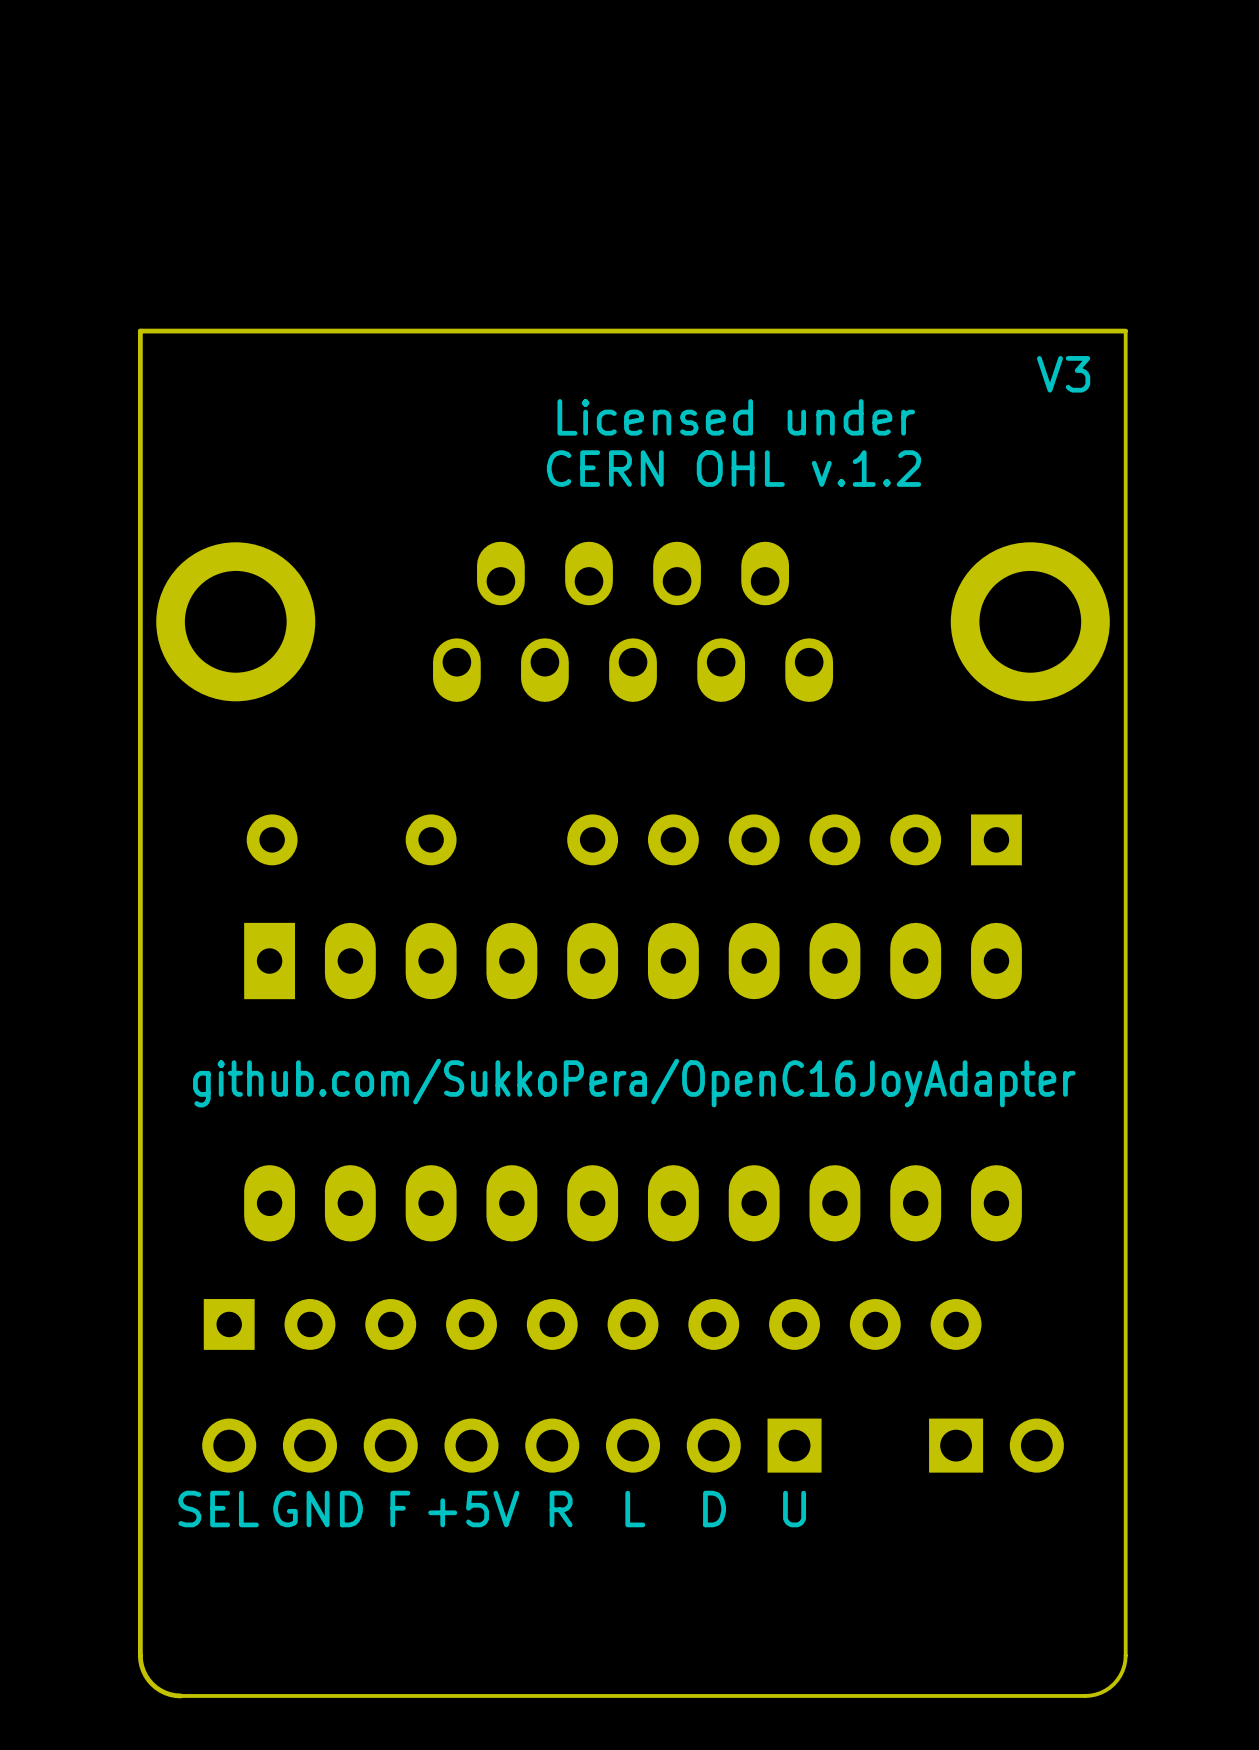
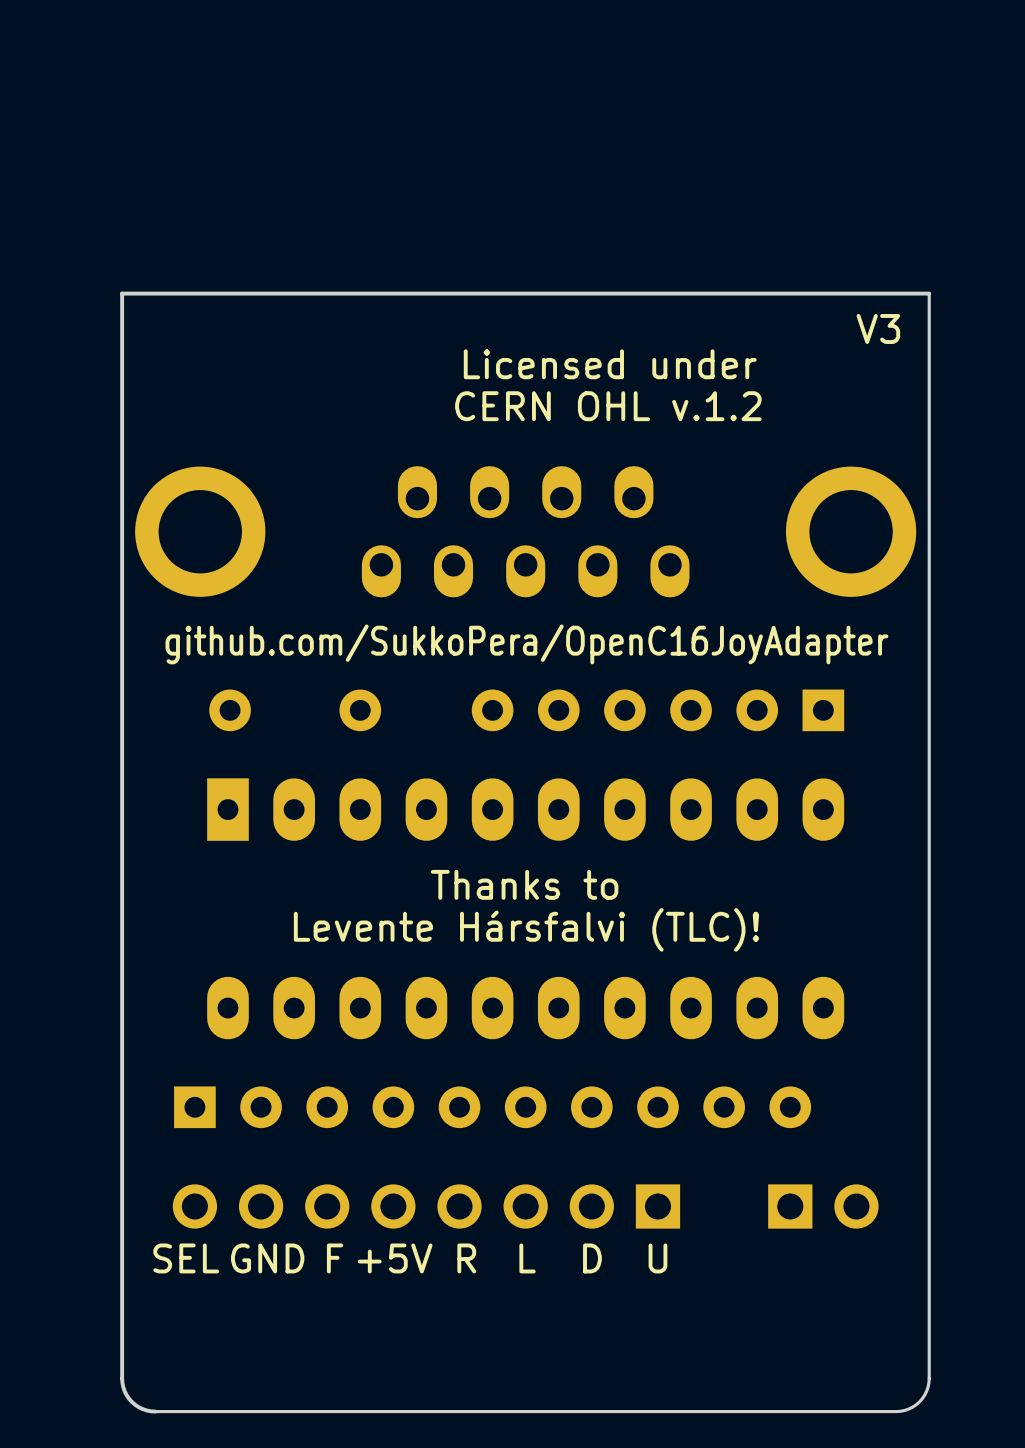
text: none -> Thanks to (524, 884)
text position: github.com/SukkoPera/OpenC16JoyAdapter (634, 1083) -> github.com/SukkoPera/OpenC16JoyAdapter (526, 644)
text: none -> Levente Hársfalvi (TLC)! (526, 929)

